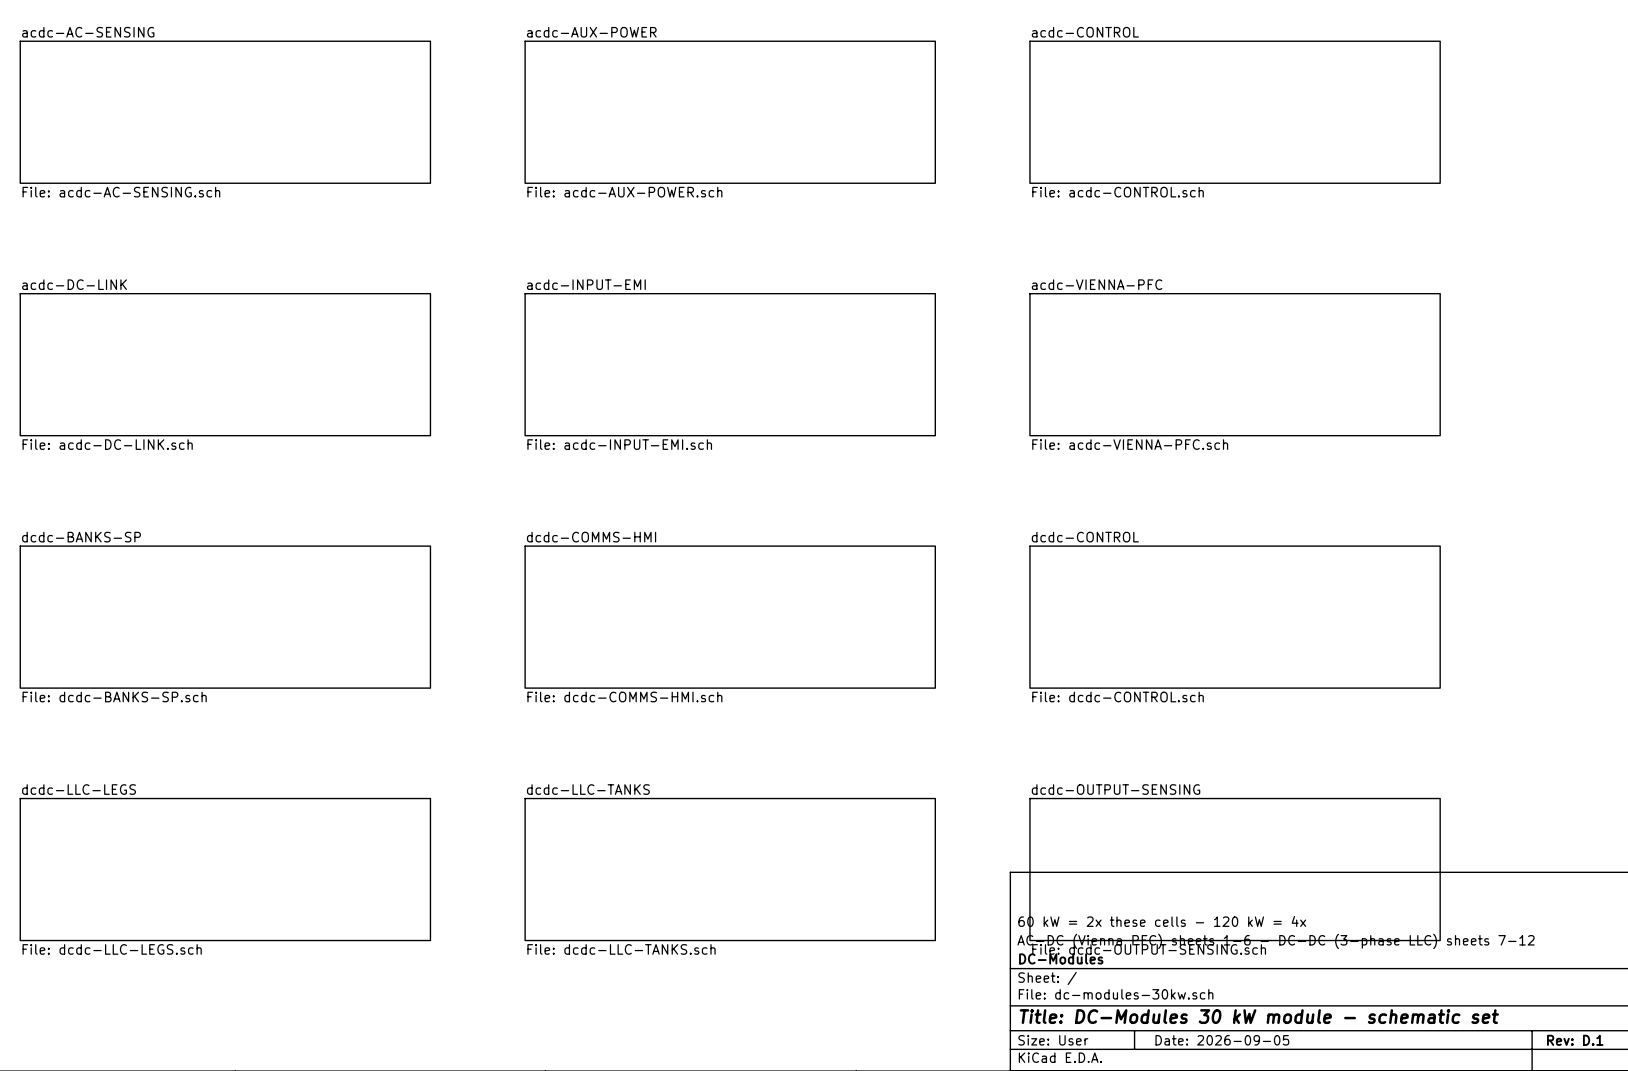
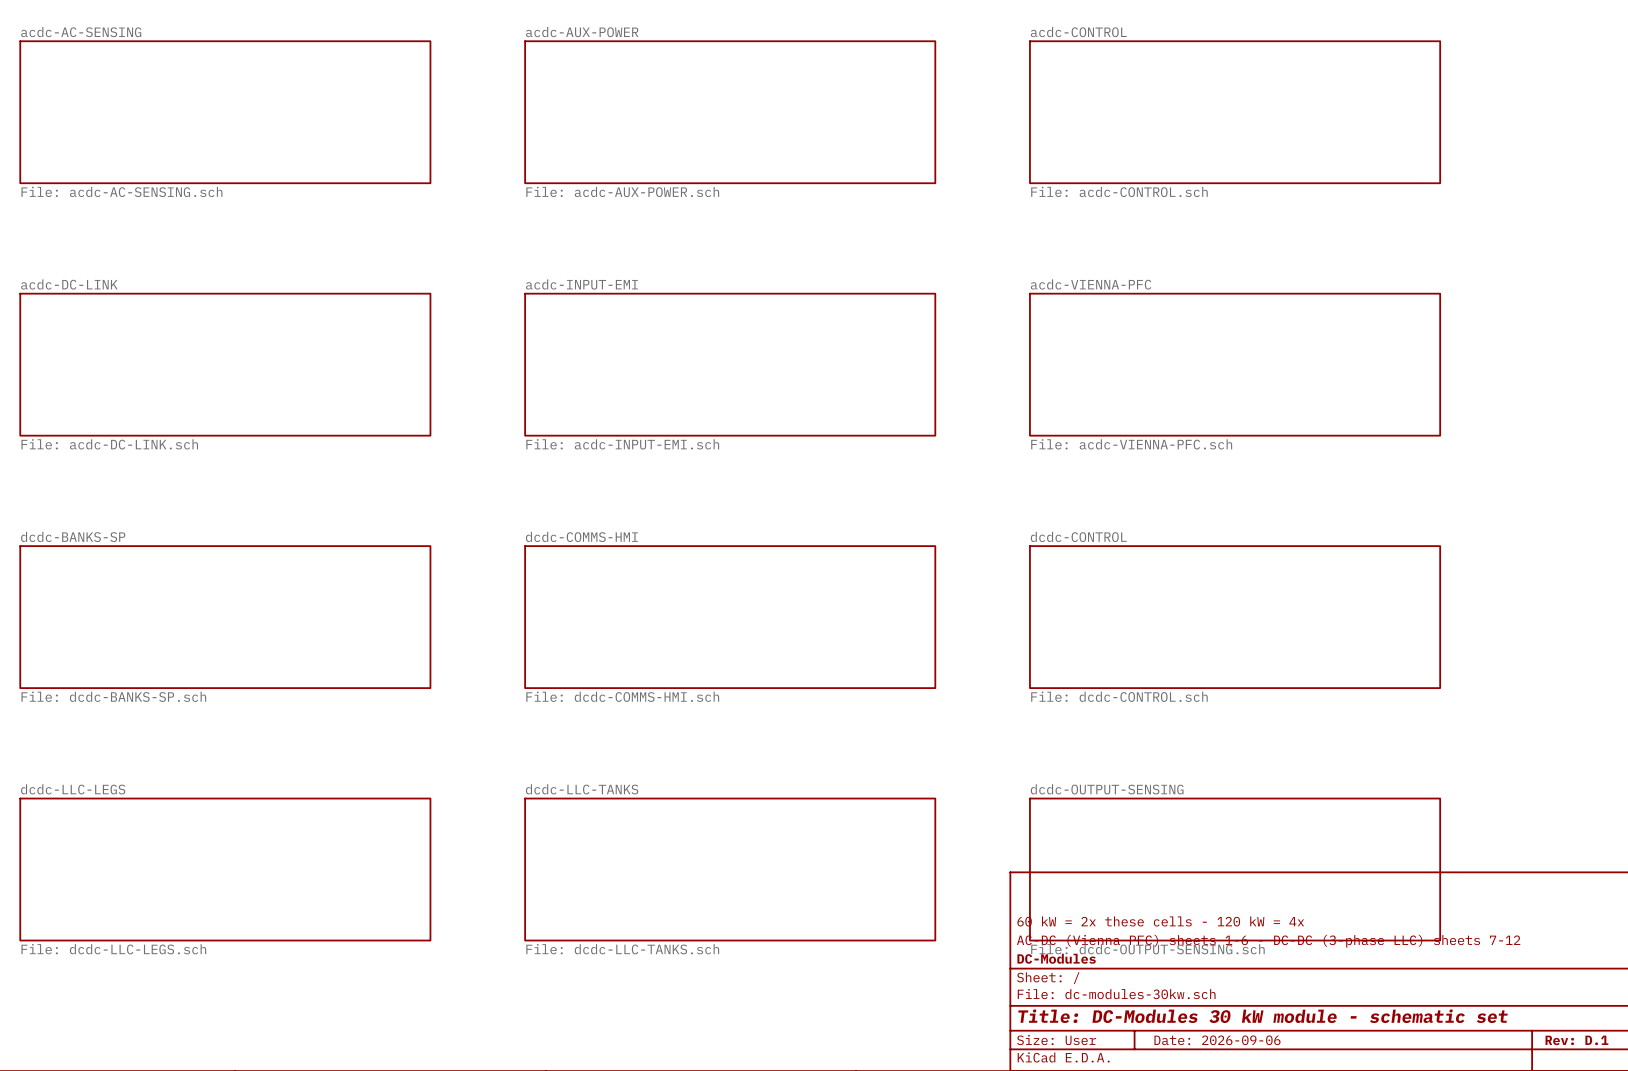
title block: Date: 2026-09-05 (1222, 1040) -> Date: 2026-09-06 (1217, 1040)

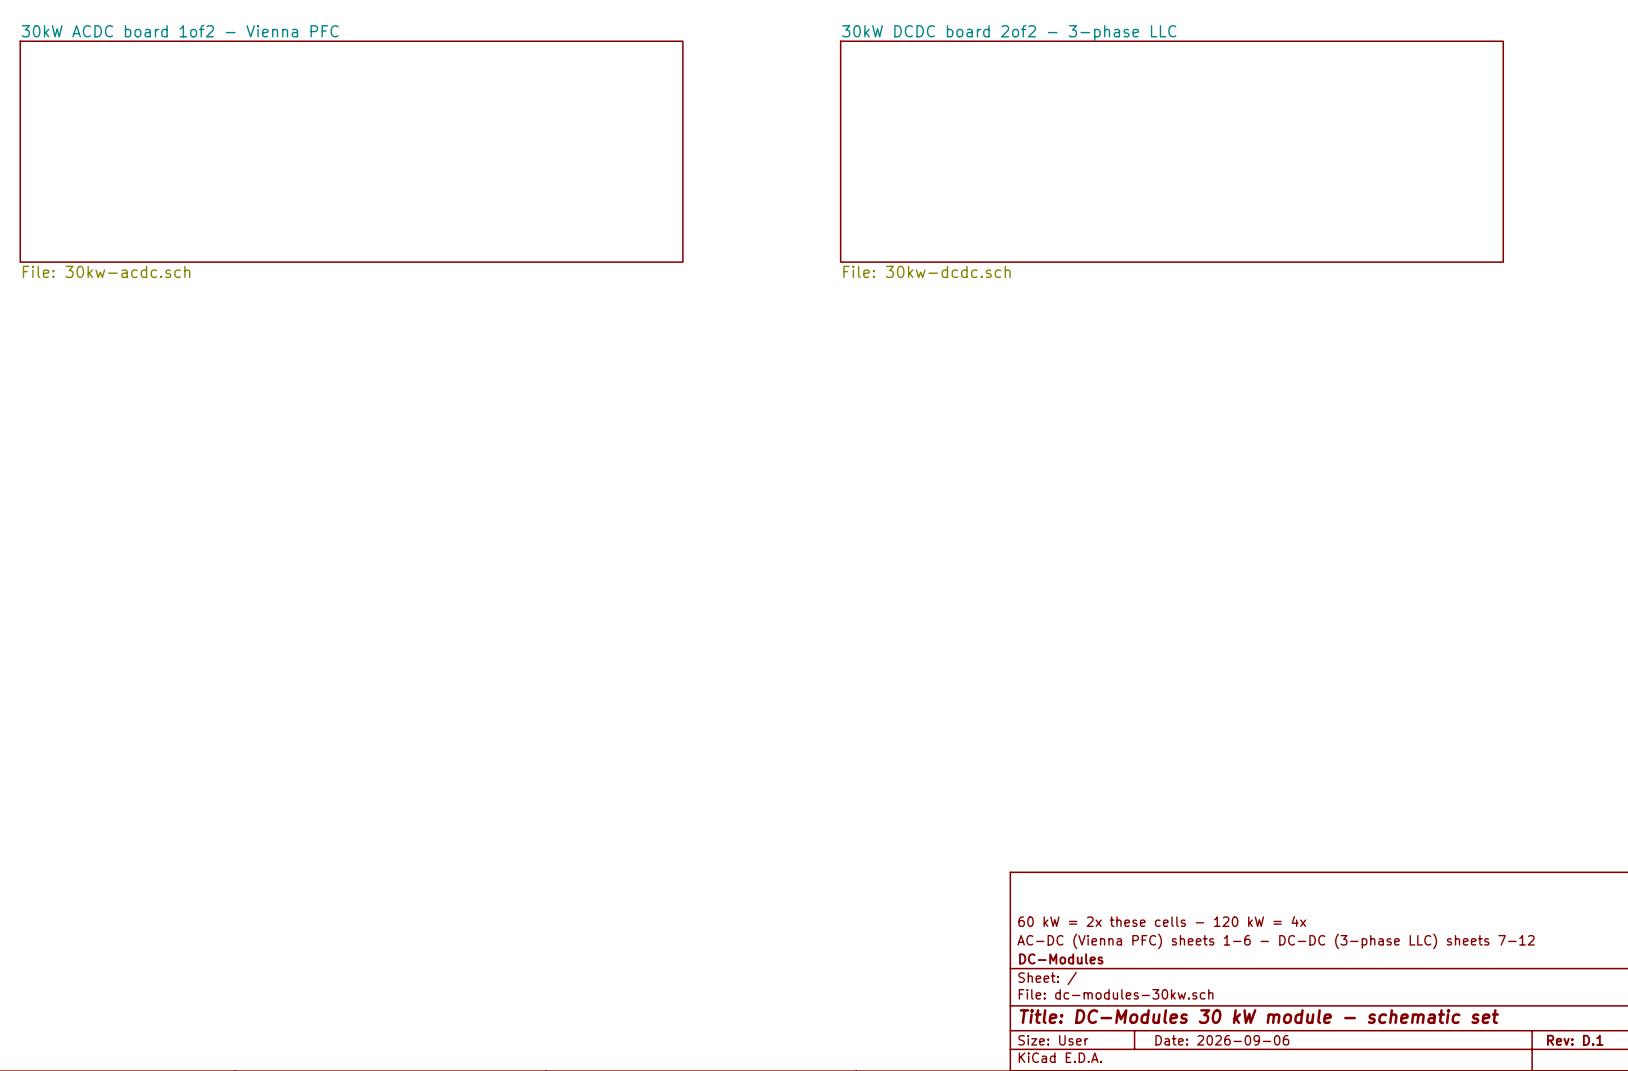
sheet acdc-AC-SENSING: File: acdc-AC-SENSING.sch (225, 112) -> none
sheet acdc-AUX-POWER: File: acdc-AUX-POWER.sch (730, 112) -> none
sheet acdc-CONTROL: File: acdc-CONTROL.sch (1235, 112) -> none
sheet 30kW ACDC board 1of2 - Vienna PFC: none -> File: 30kw-acdc.sch (351, 151)
sheet 30kW DCDC board 2of2 - 3-phase LLC: none -> File: 30kw-dcdc.sch (1171, 151)
sheet acdc-DC-LINK: File: acdc-DC-LINK.sch (225, 364) -> none
sheet acdc-INPUT-EMI: File: acdc-INPUT-EMI.sch (730, 364) -> none
sheet acdc-VIENNA-PFC: File: acdc-VIENNA-PFC.sch (1235, 364) -> none
sheet dcdc-BANKS-SP: File: dcdc-BANKS-SP.sch (225, 617) -> none
sheet dcdc-COMMS-HMI: File: dcdc-COMMS-HMI.sch (730, 617) -> none
sheet dcdc-CONTROL: File: dcdc-CONTROL.sch (1235, 617) -> none
sheet dcdc-LLC-LEGS: File: dcdc-LLC-LEGS.sch (225, 869) -> none
sheet dcdc-LLC-TANKS: File: dcdc-LLC-TANKS.sch (730, 869) -> none
sheet dcdc-OUTPUT-SENSING: File: dcdc-OUTPUT-SENSING.sch (1235, 869) -> none

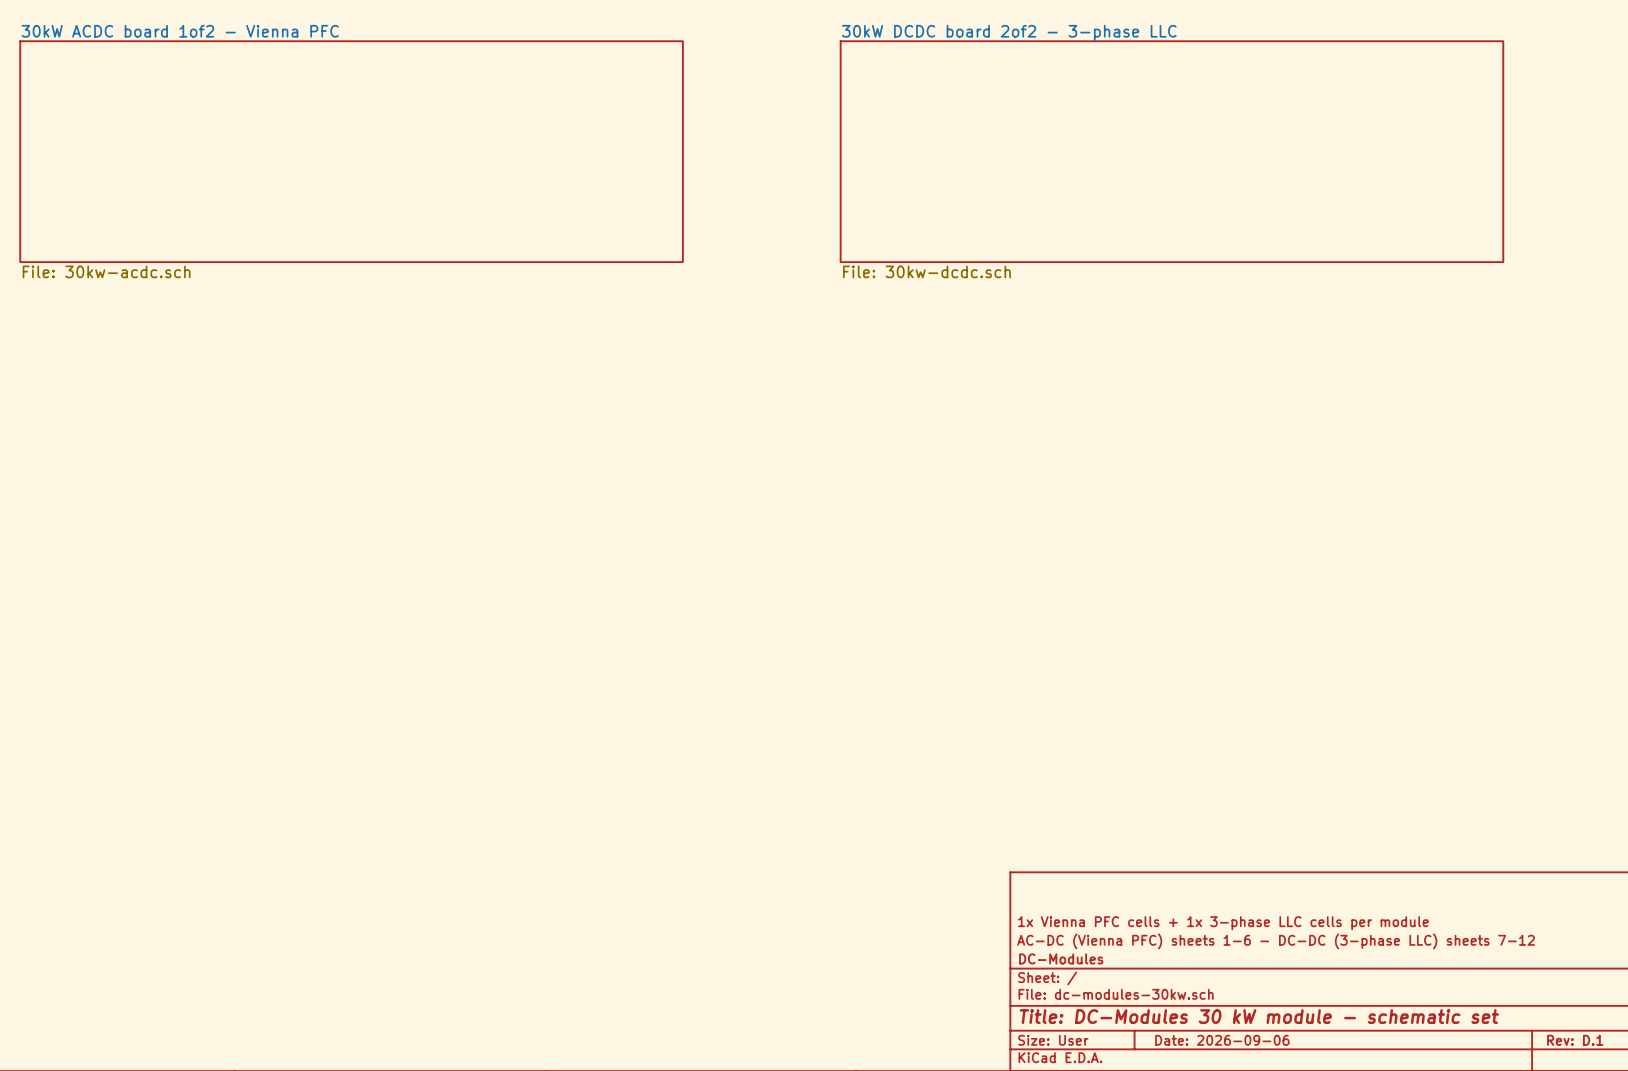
title block: 60 kW = 2x these cells - 120 kW = 4x (1162, 921) -> 1x Vienna PFC cells + 1x 3-phase LLC cells per module (1223, 923)

